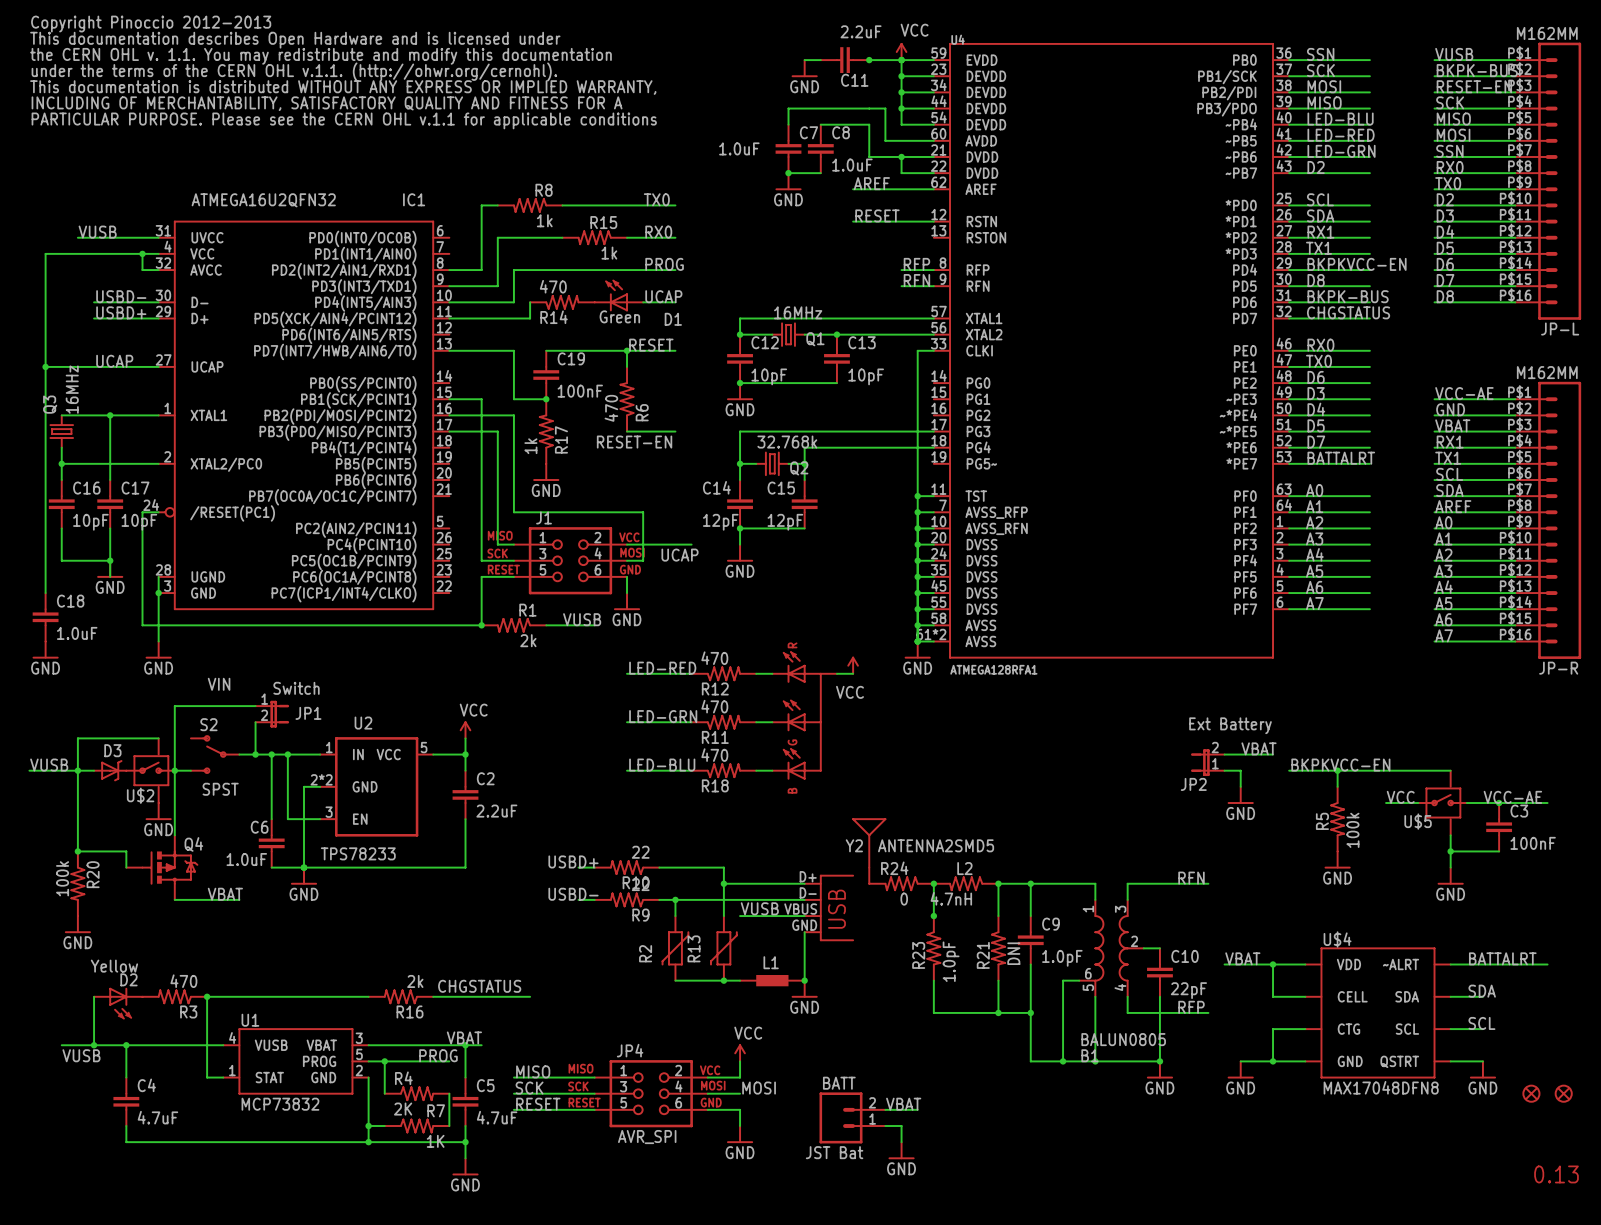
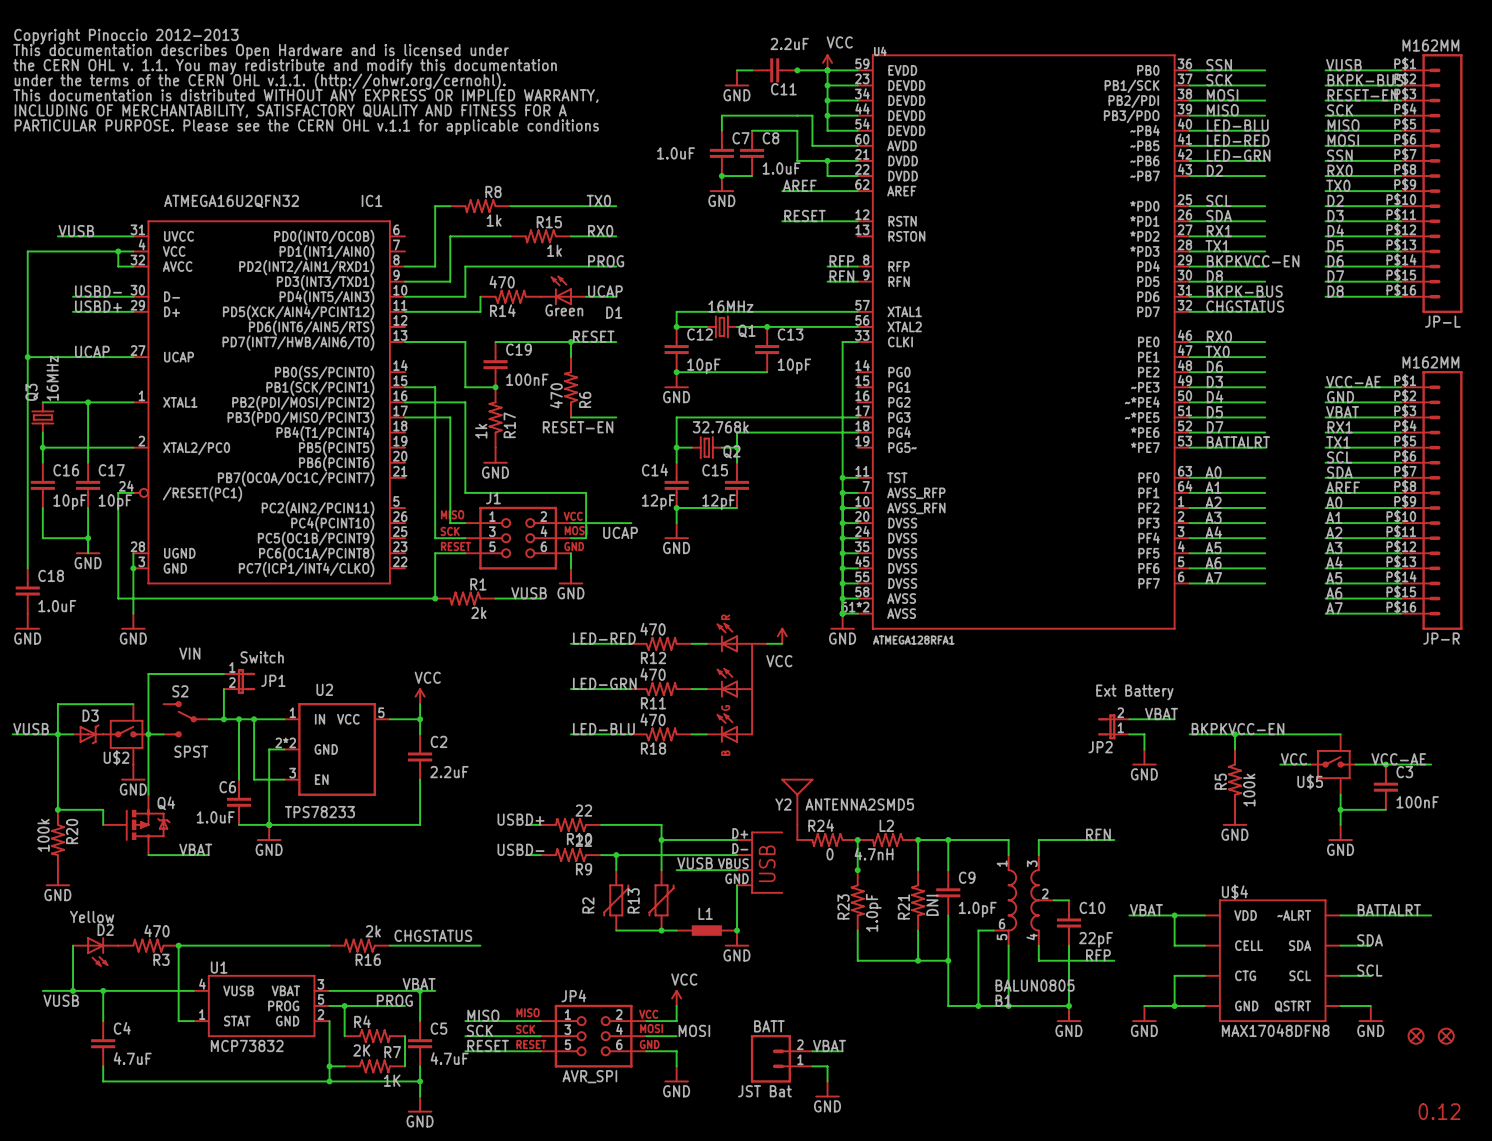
text: 0.13 (1556, 1174) -> 0.12 (1439, 1111)

